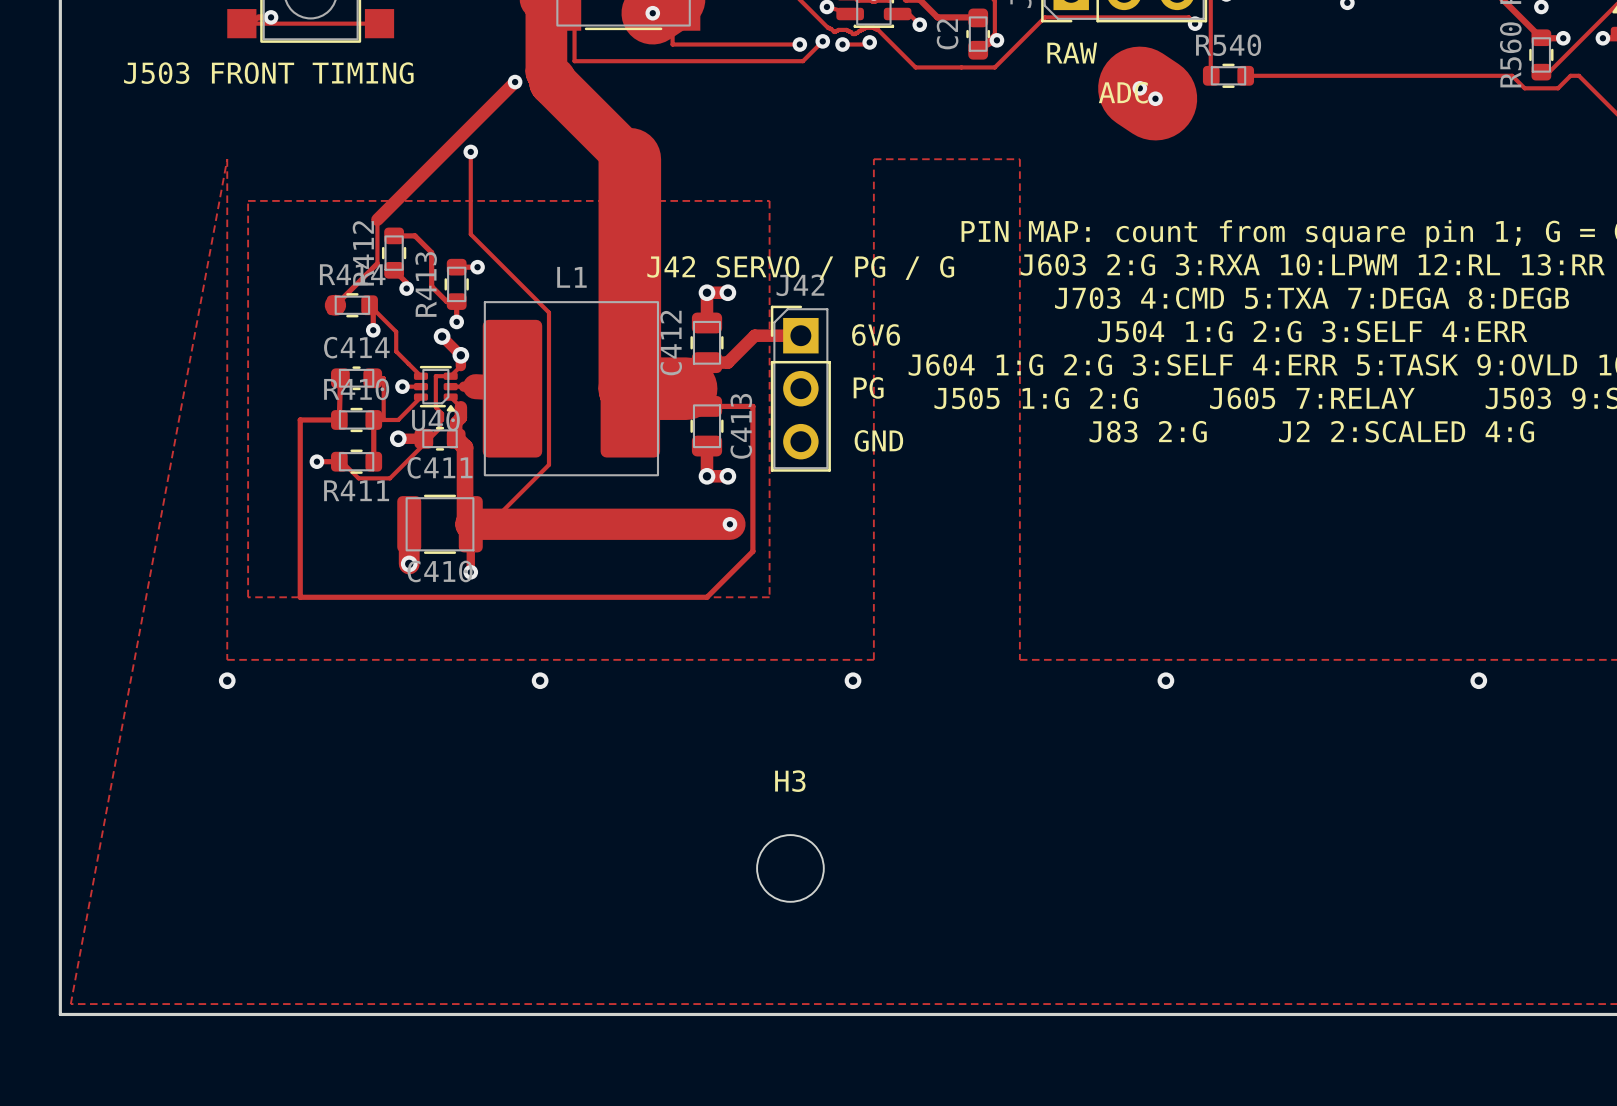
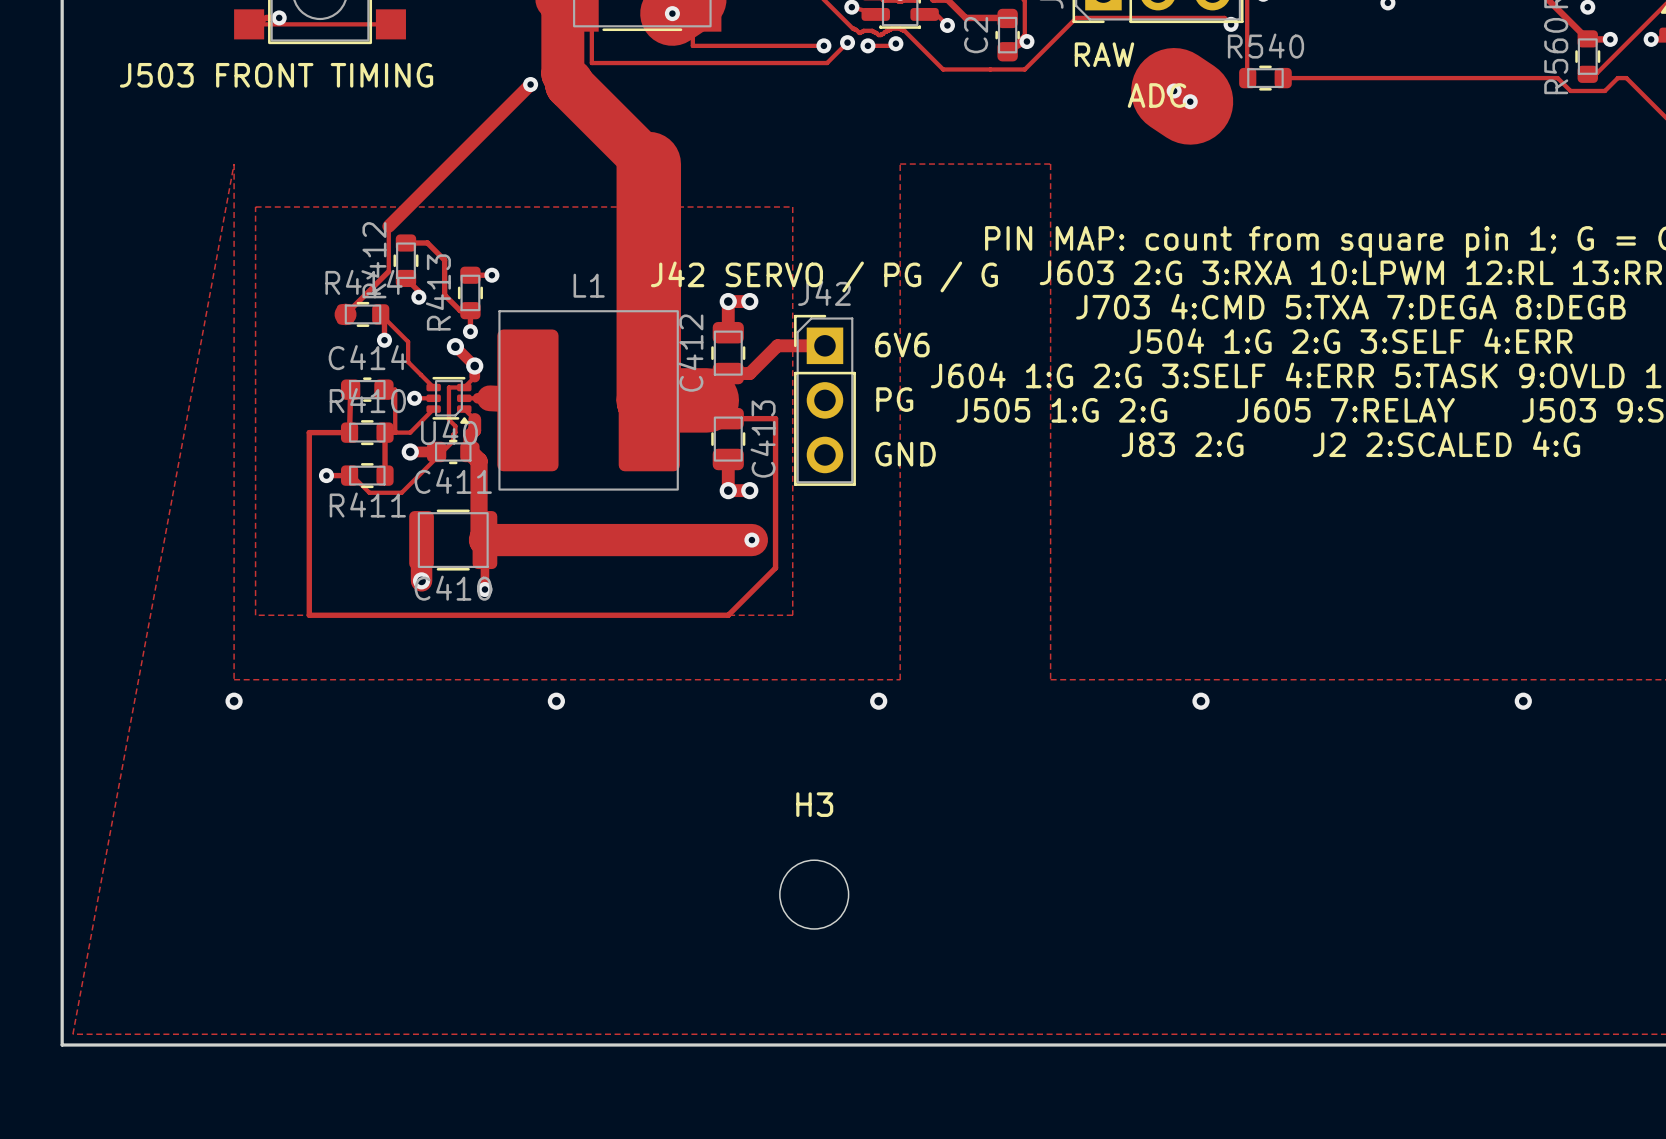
track: (470, 151) (470, 234) (548, 312) (548, 464) (489, 524) (470, 524) -> none
via: (470, 151) -> none

